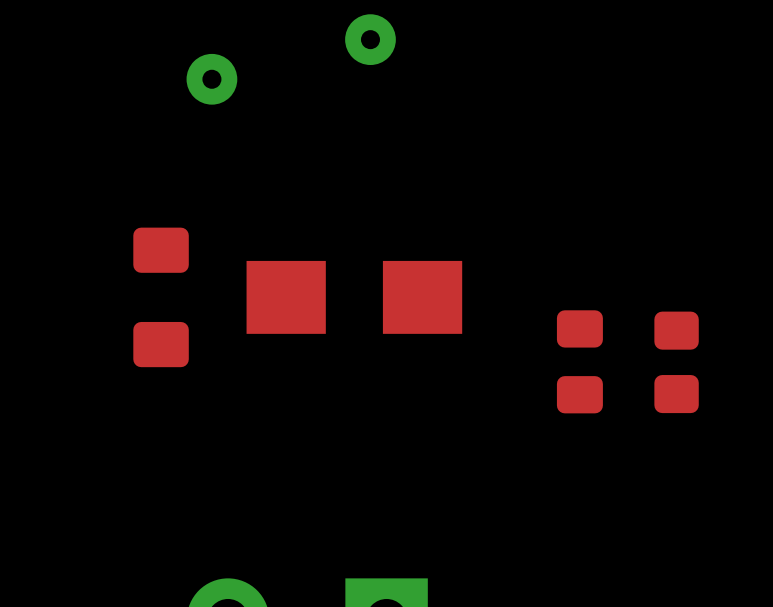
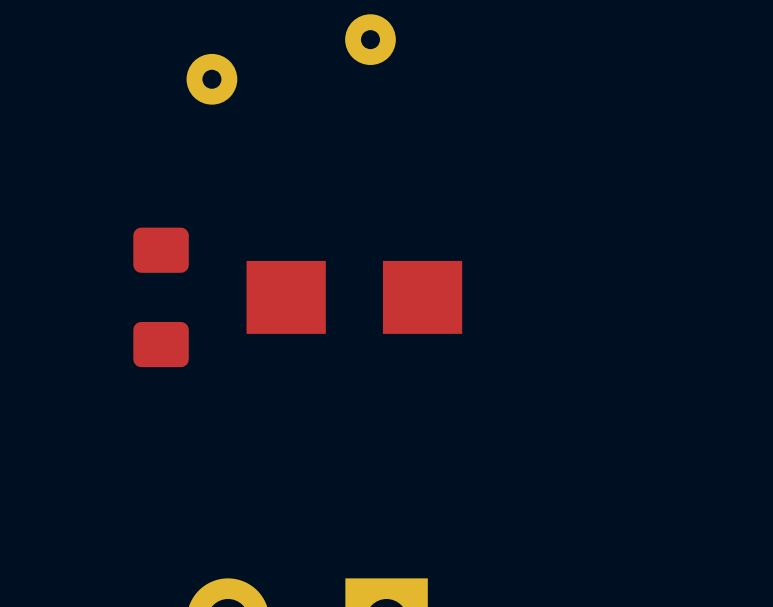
part: (579, 361) -> none
part: (676, 362) -> none

